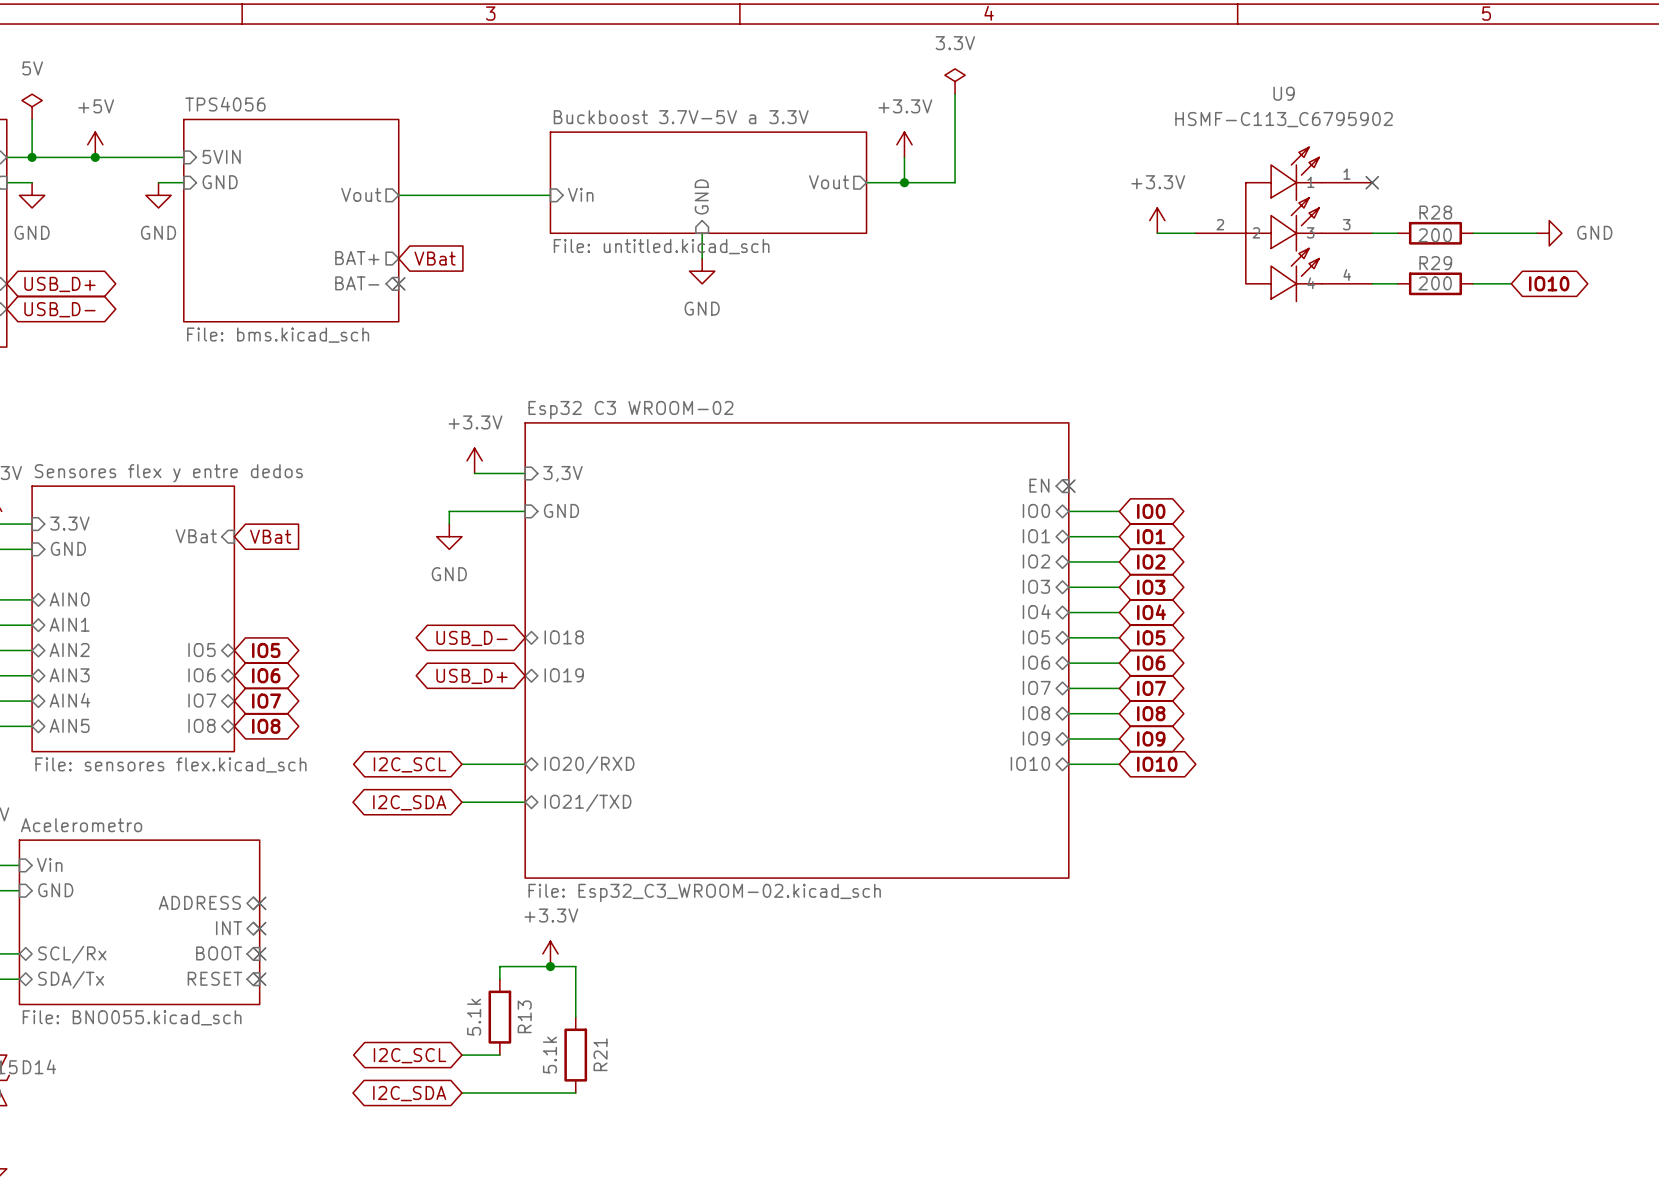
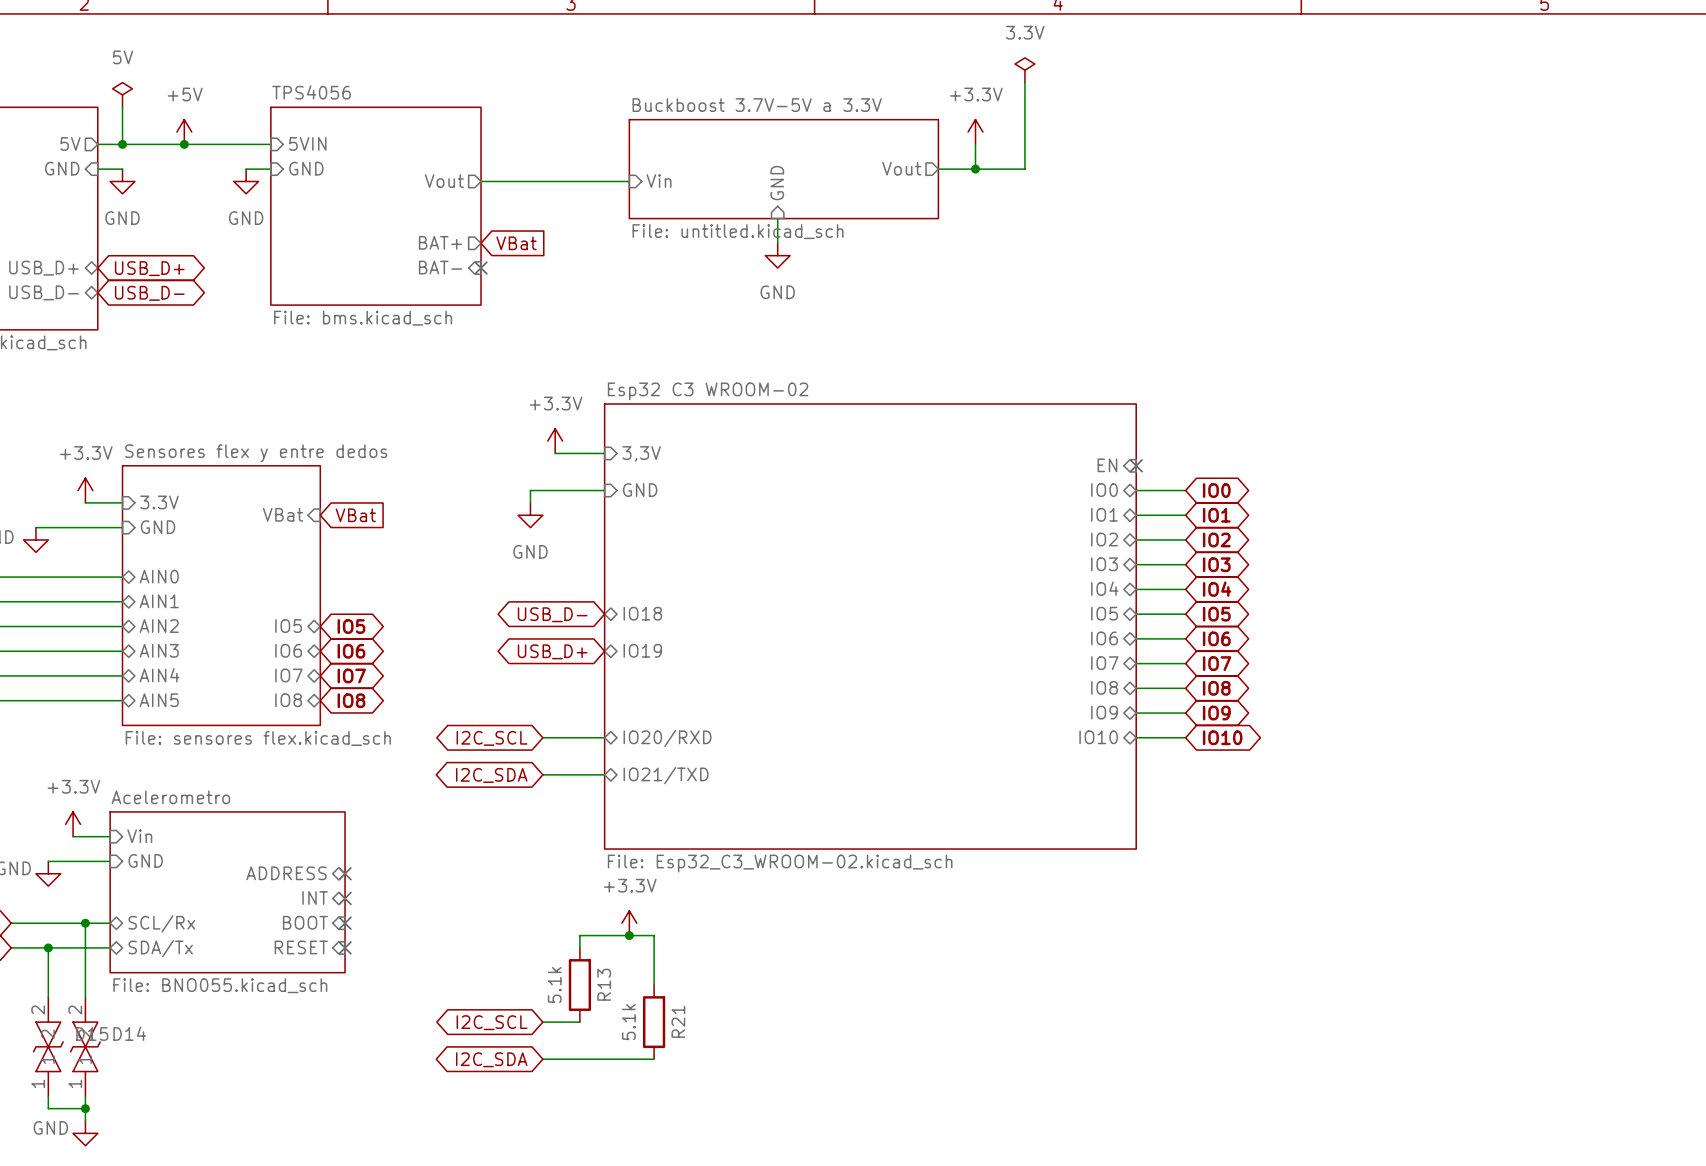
no-connect mark: (1372, 182) -> none
power symbol: +3.3V (1157, 220) -> none
U9: HSMF-C113_C6795902 (1283, 224) -> none
wire: (1157, 233) (1195, 233) -> none
wire: (1372, 233) (1397, 233) -> none
R28: 200 (1435, 233) -> none
wire: (1473, 233) (1536, 233) -> none
power symbol: GND (1549, 233) -> none
wire: (1372, 283) (1397, 283) -> none
R29: 200 (1435, 283) -> none
wire: (1473, 283) (1511, 283) -> none
global label: IO10 (1549, 283) -> none

